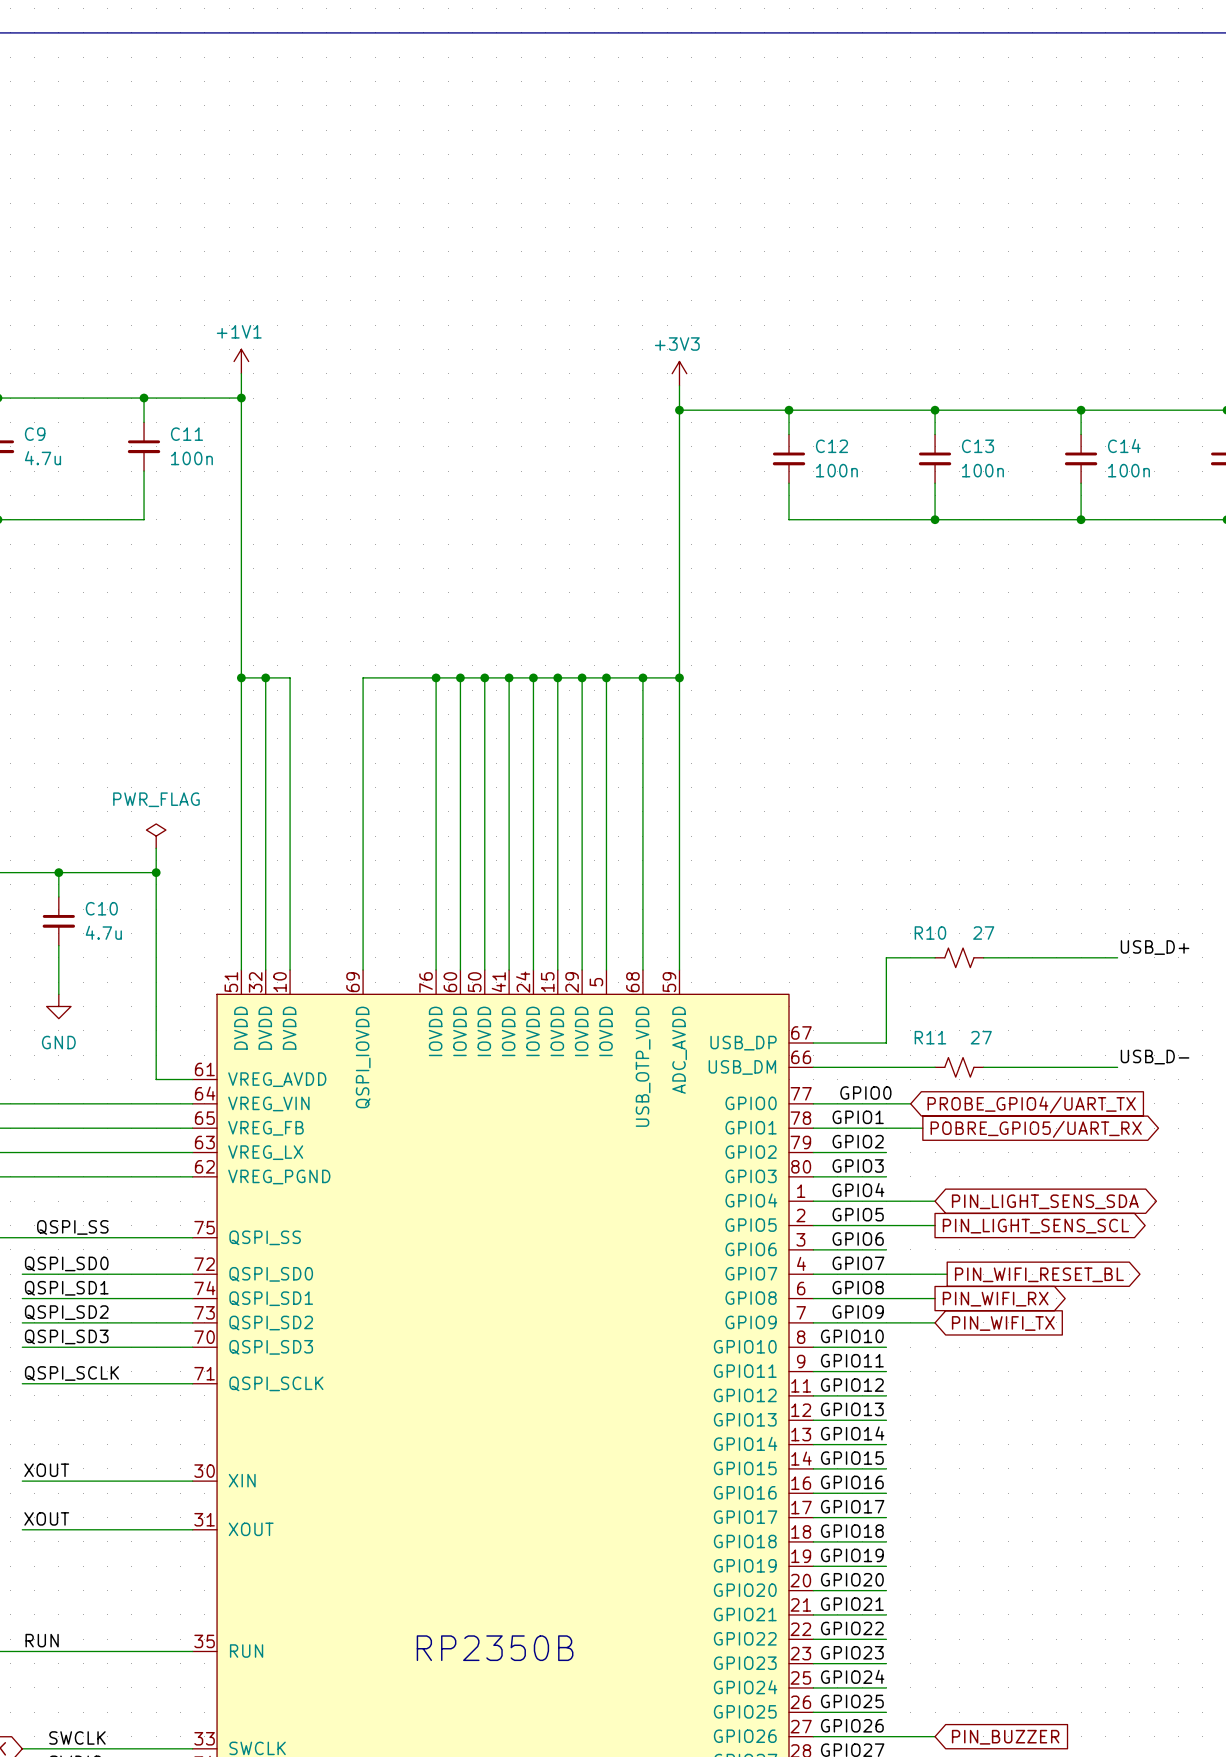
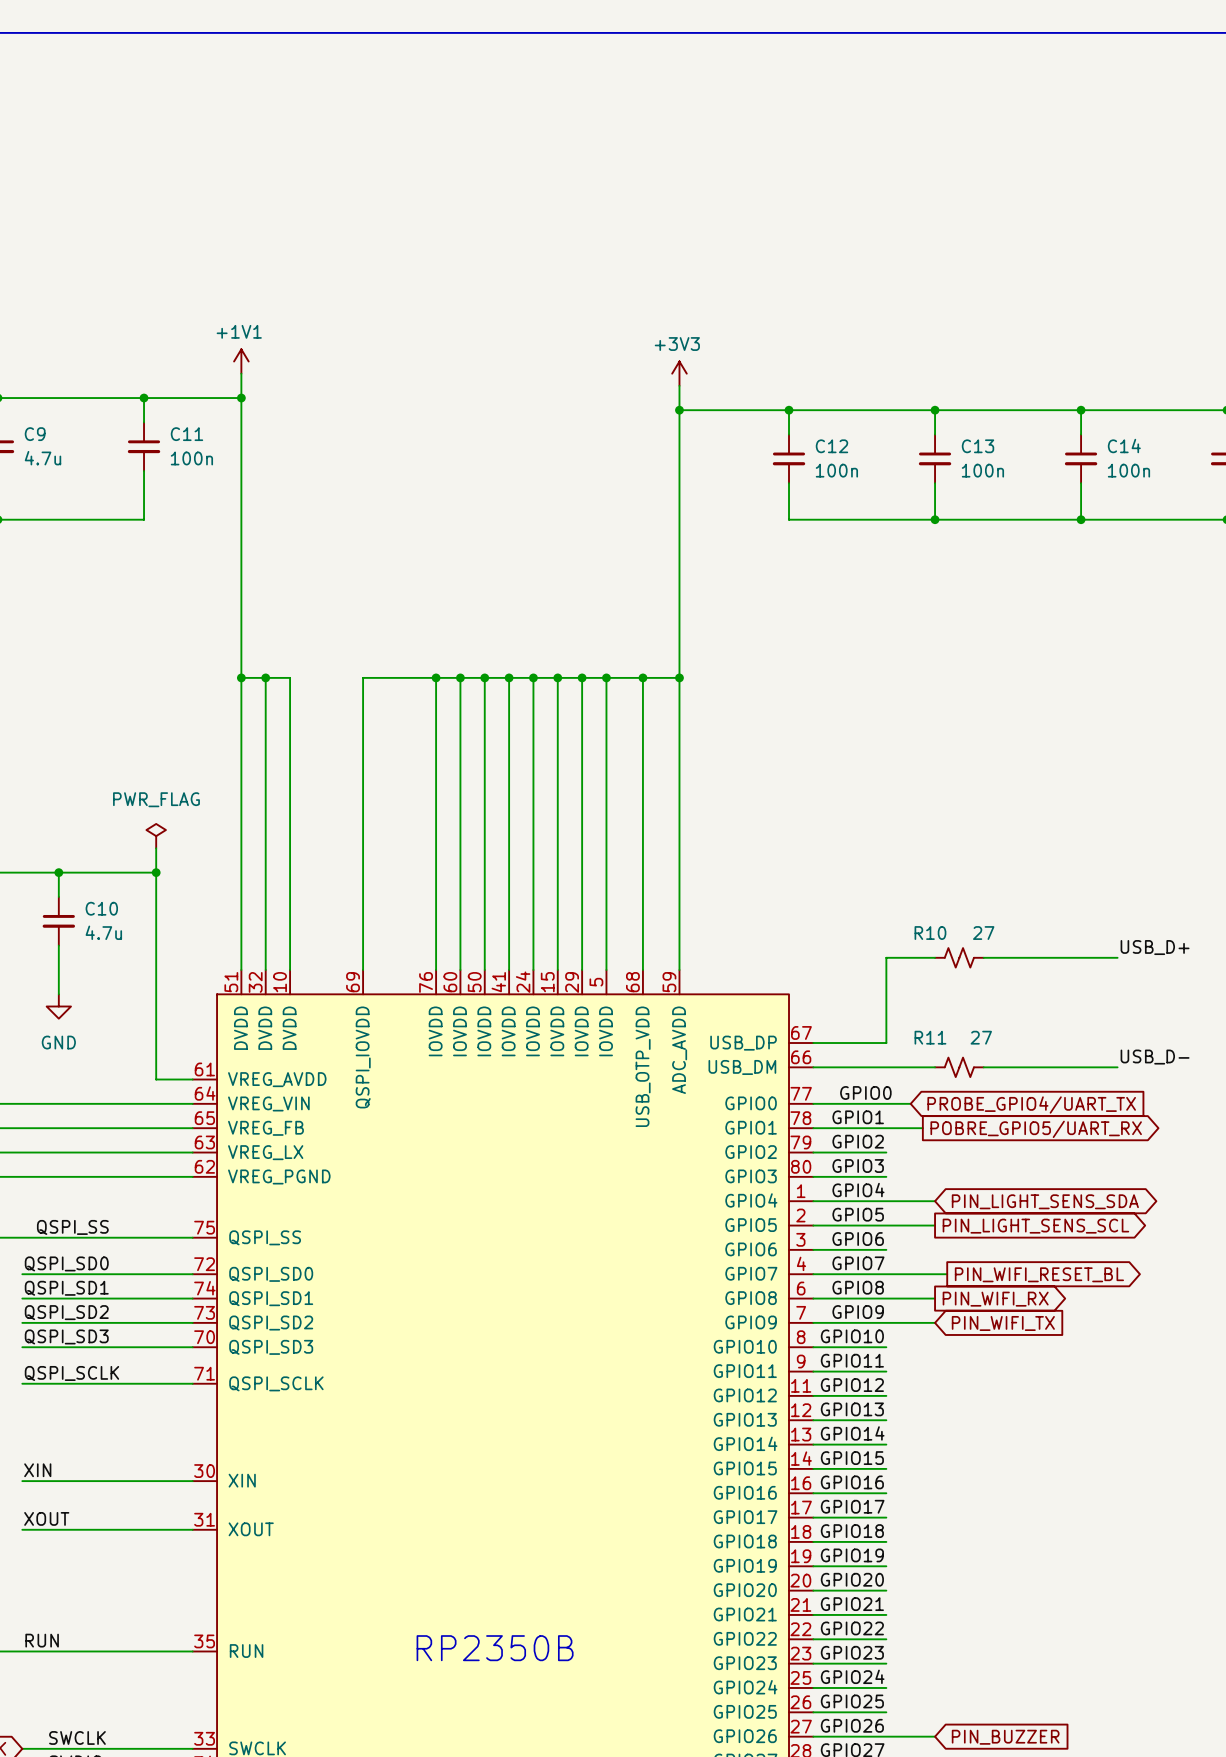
label: XOUT (46, 1470) -> XIN (37, 1470)

